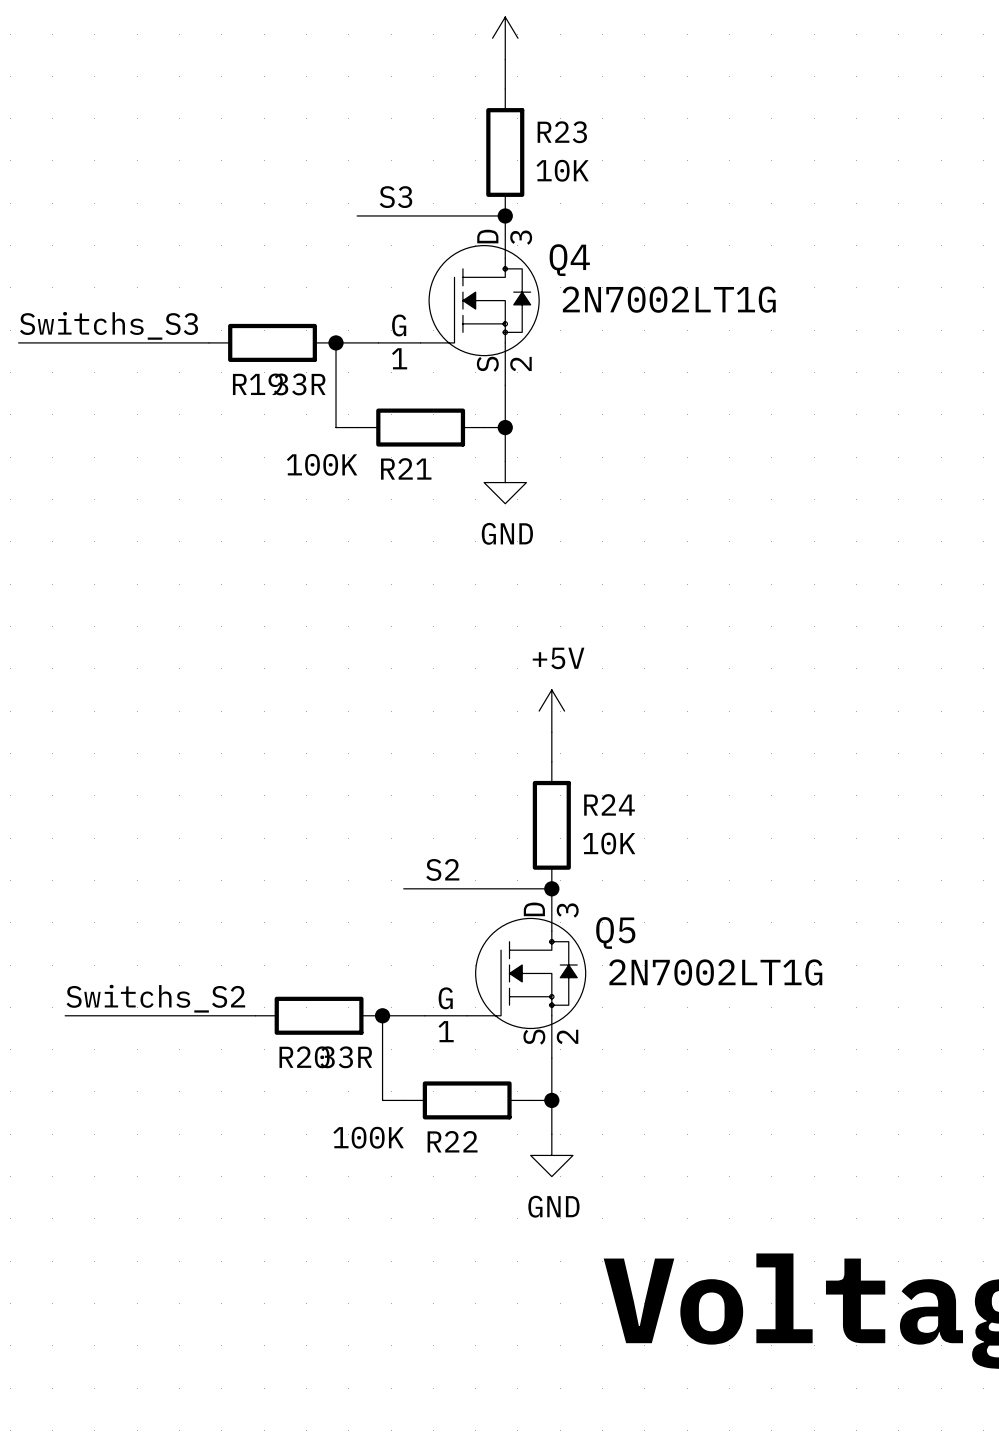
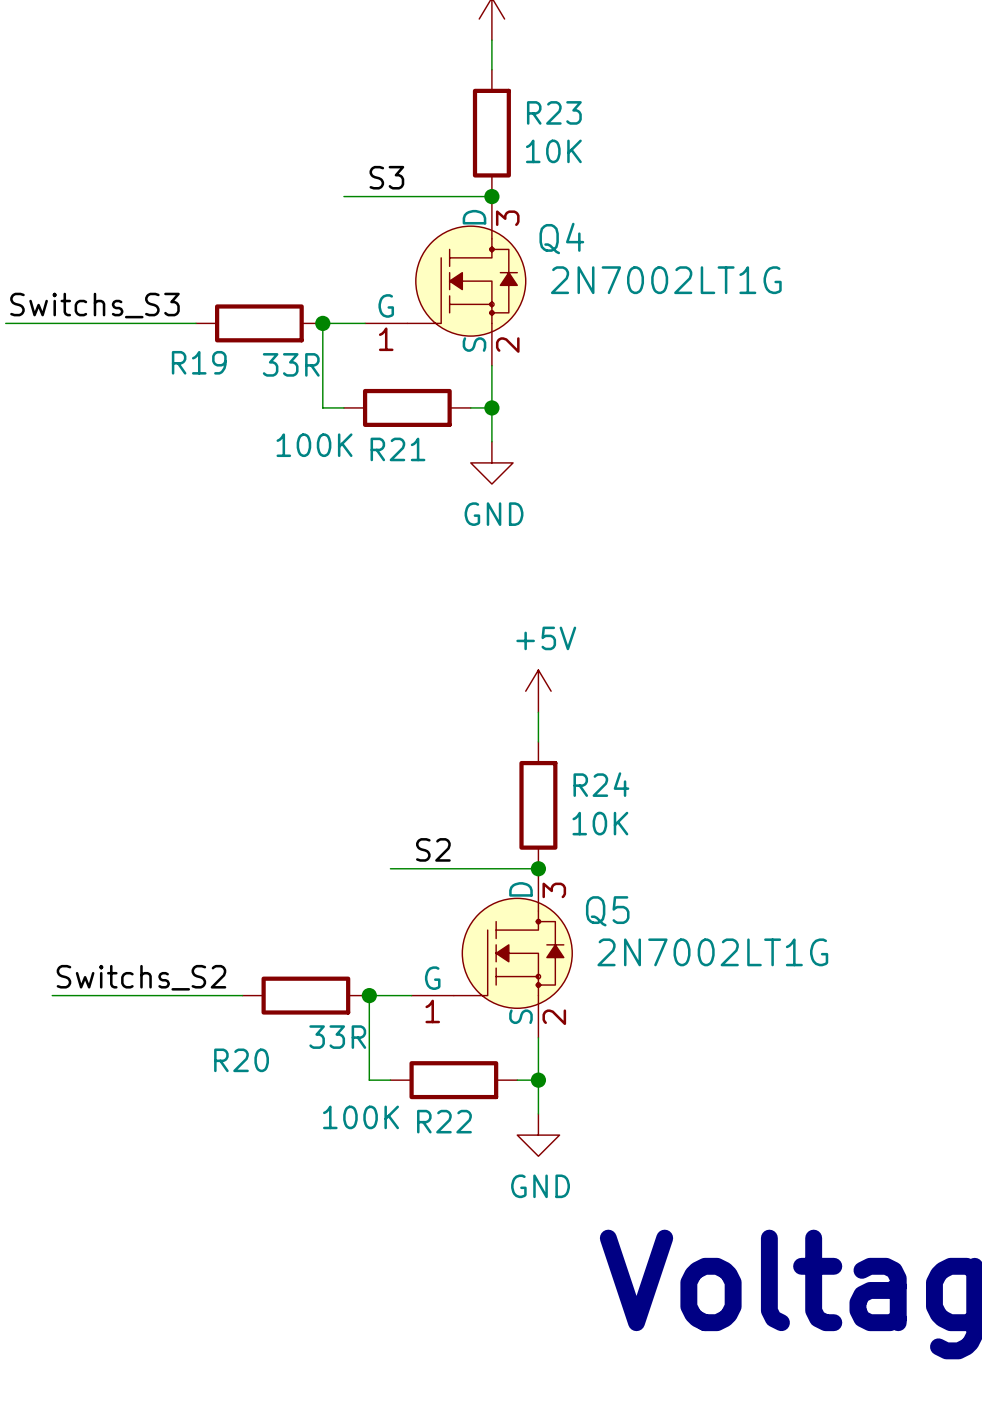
R19 name position: R19 (257, 384) -> R19 (199, 362)
R20 name position: R20 (304, 1057) -> R20 (241, 1060)

